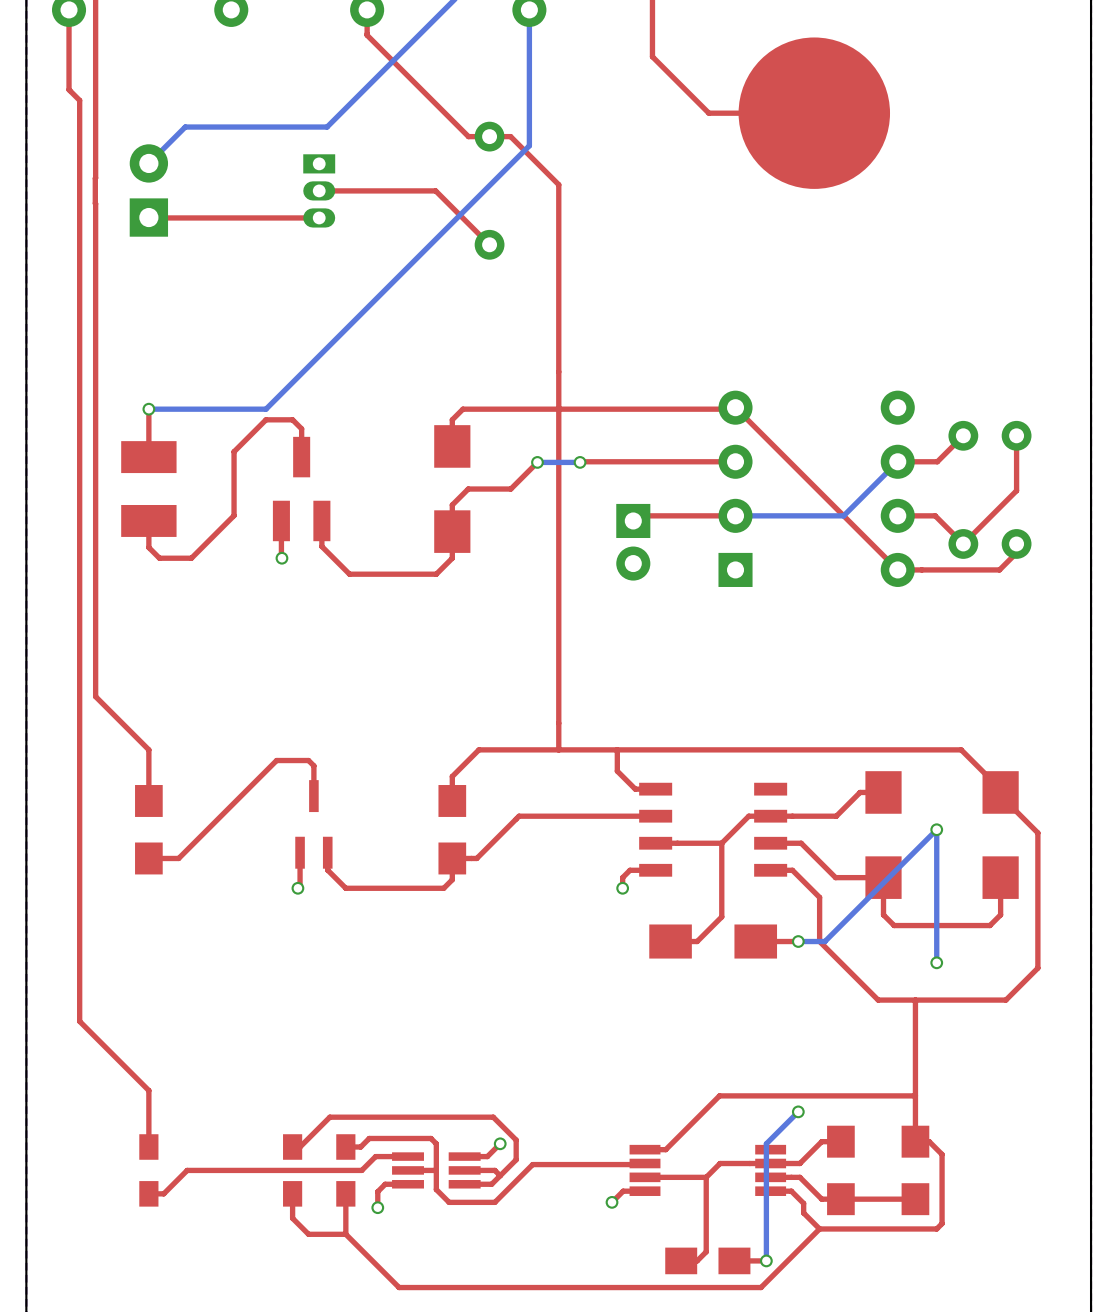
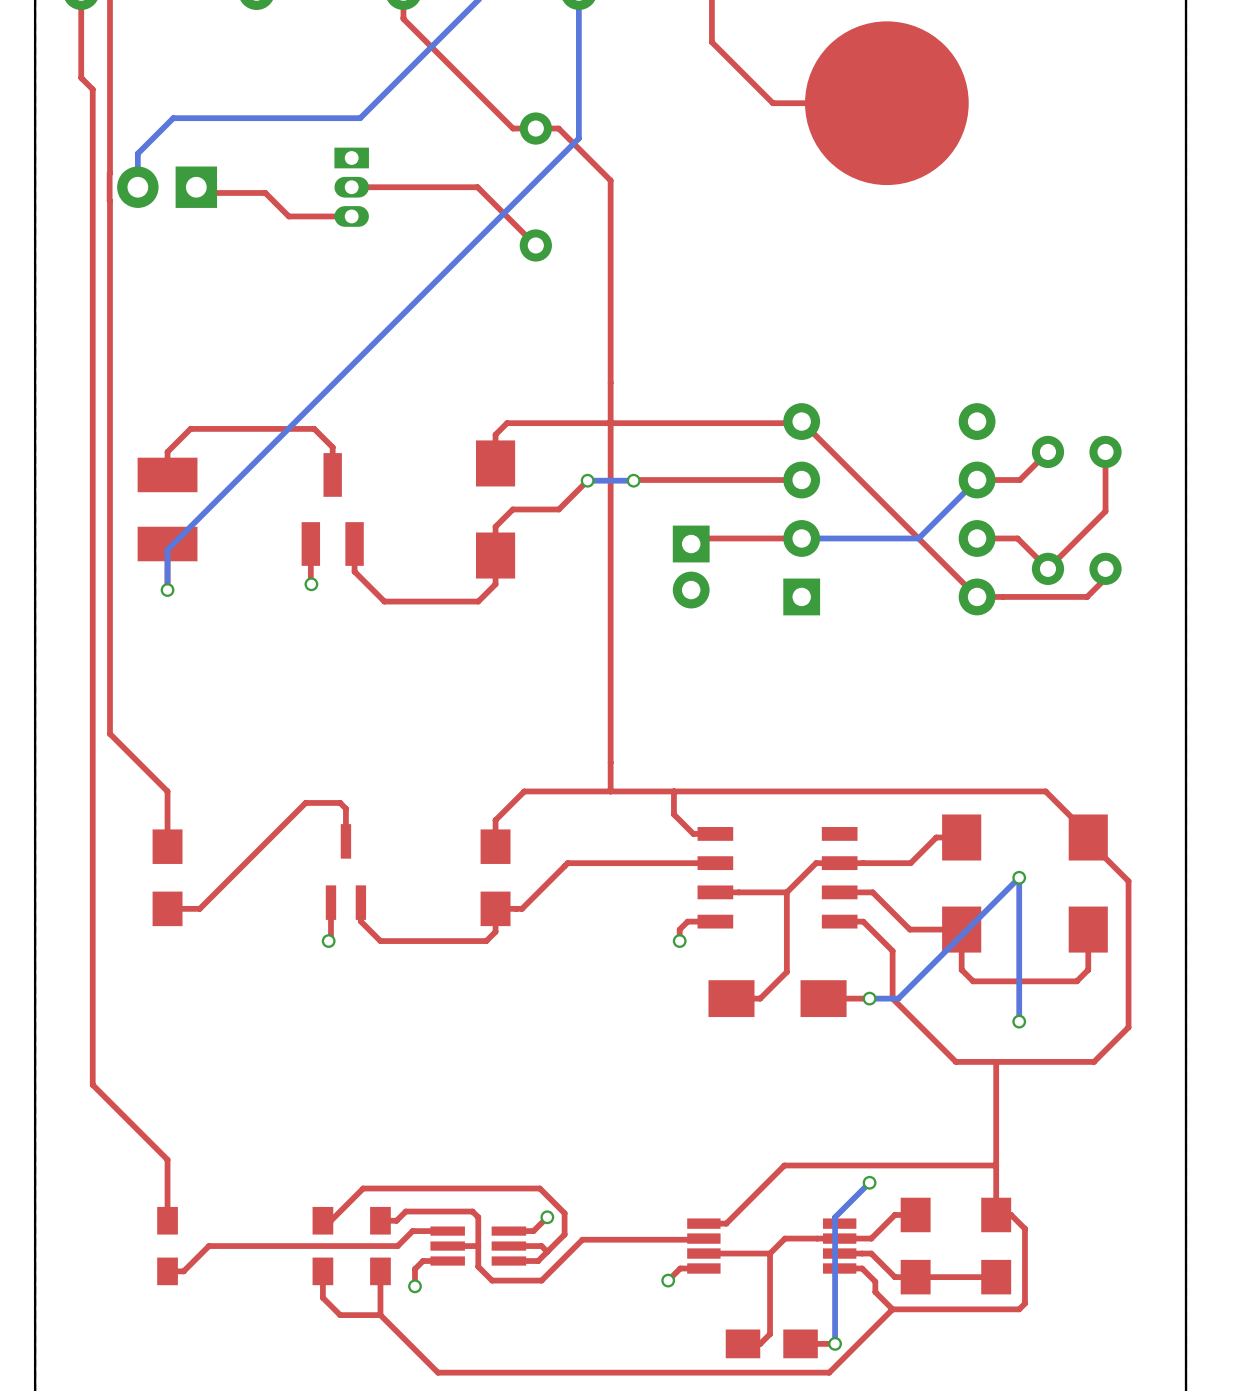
bottom track: (185, 127) (148, 163) -> (206, 118) (173, 118) (137, 153) (137, 187)
part rotation: 0° (148, 190) -> 90° counterclockwise (167, 187)
top track: (148, 217) (261, 217) -> (196, 187) (202, 192) (265, 192) (288, 216)
top track: (148, 409) (148, 435) -> none
via: (148, 409) -> none
bottom track: (265, 409) (148, 409) -> (294, 423) (167, 549) (167, 590)
top track: (301, 431) (301, 428) (292, 419) (265, 419) (234, 451) (234, 515) (191, 558) (159, 558) (148, 547) -> (332, 447) (314, 428) (190, 428) (167, 451)
via: none -> (167, 590)

